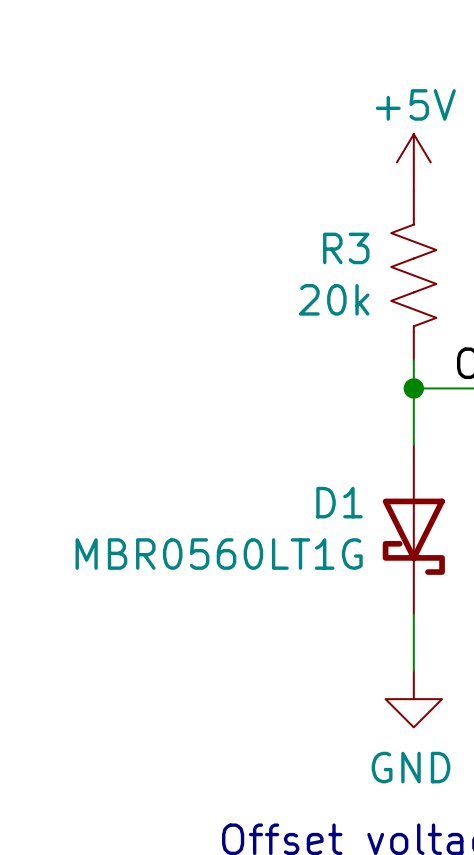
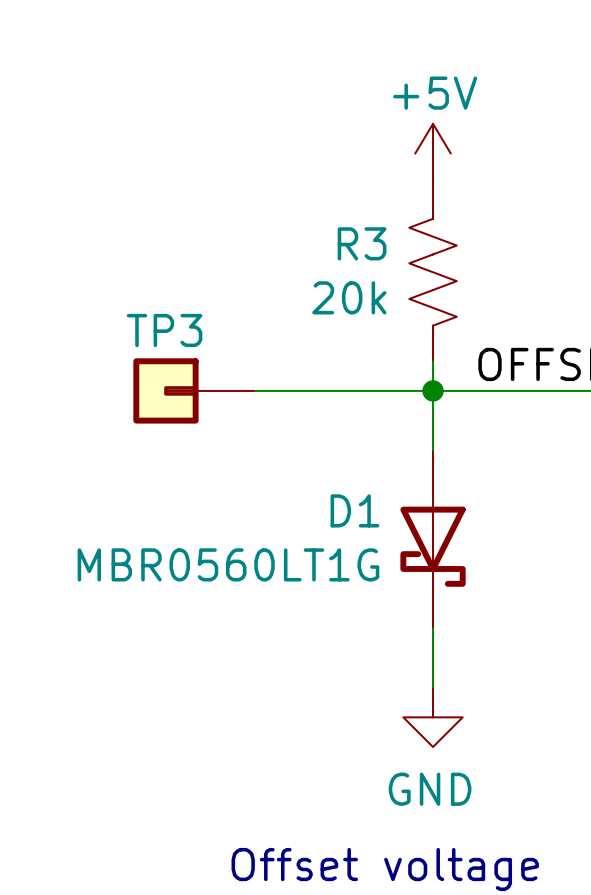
TP3: none -> (194, 390)
wire: none -> (254, 390) (433, 390)

